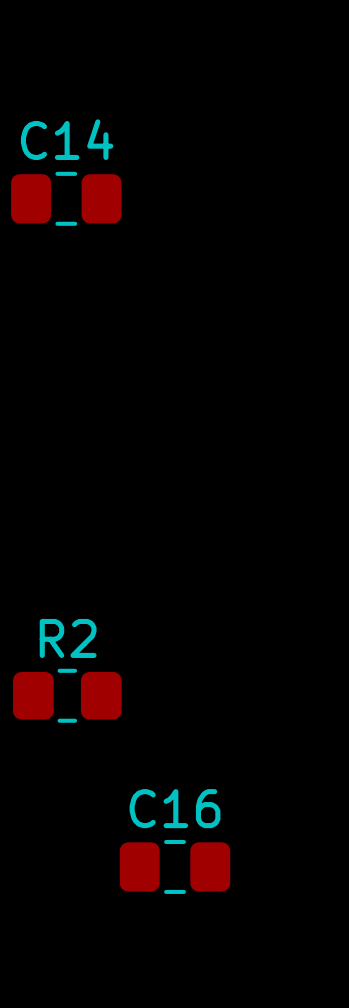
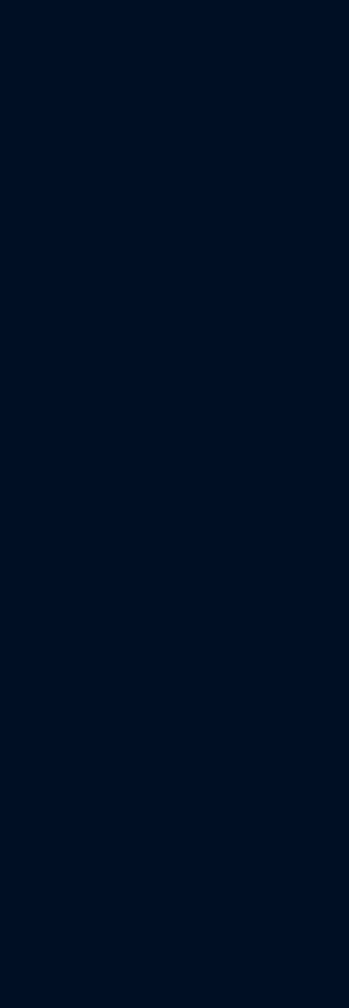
C14: (66, 198) -> none
R2: (67, 695) -> none
C16: (175, 866) -> none

